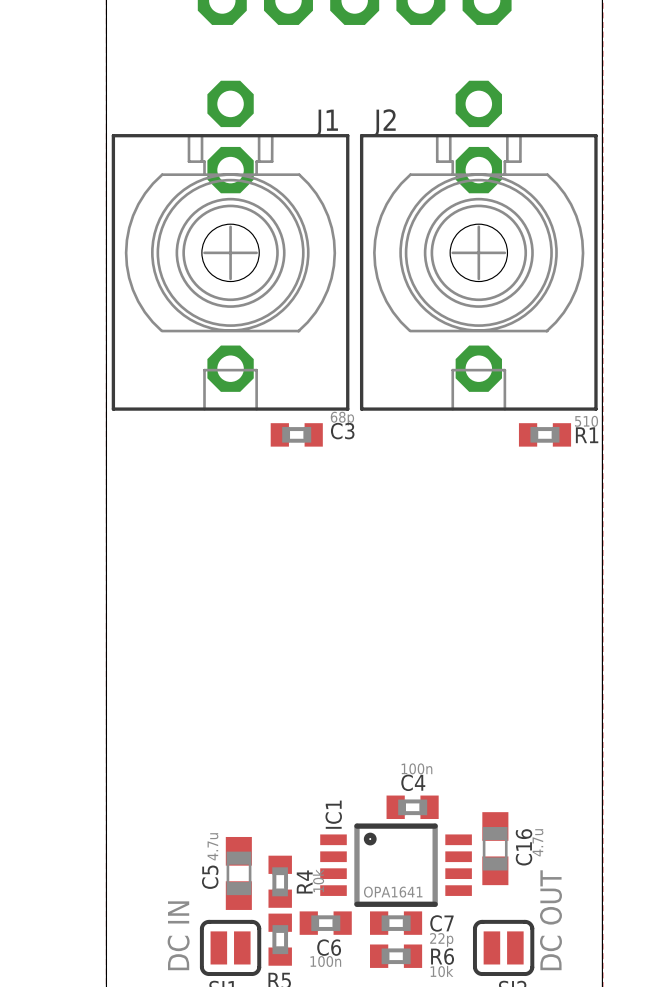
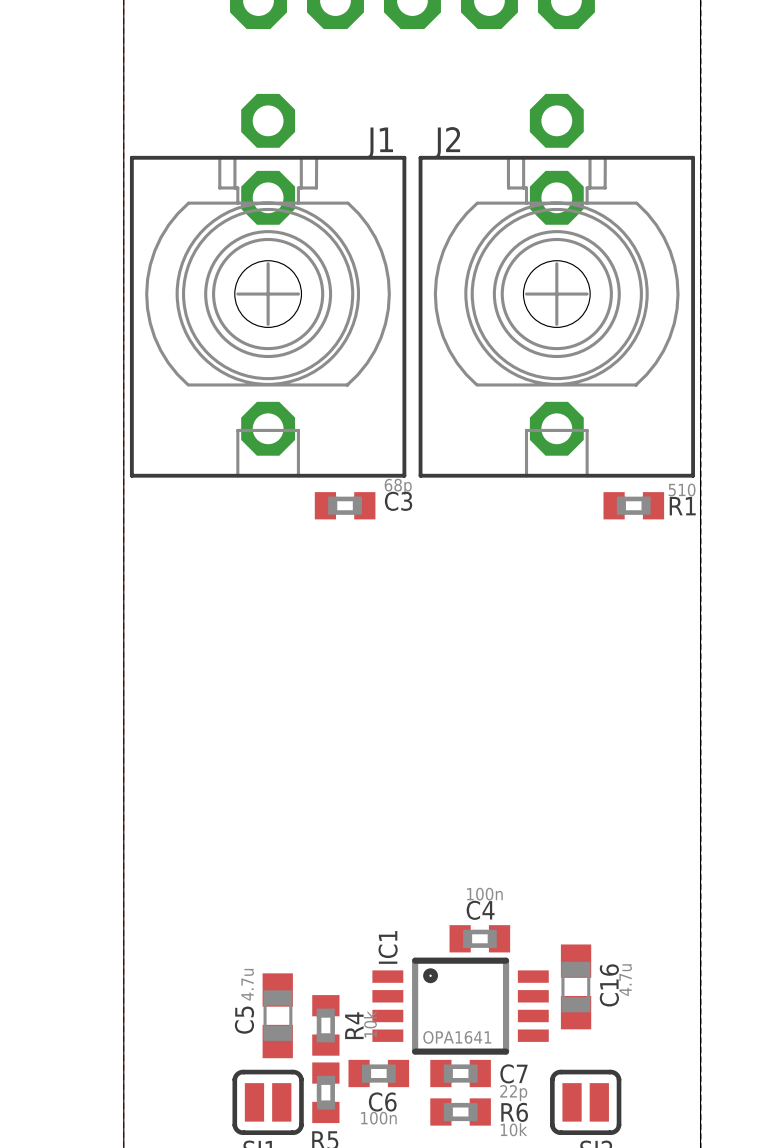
text: DC OUT (550, 920) -> none
text: DC IN (178, 935) -> none

